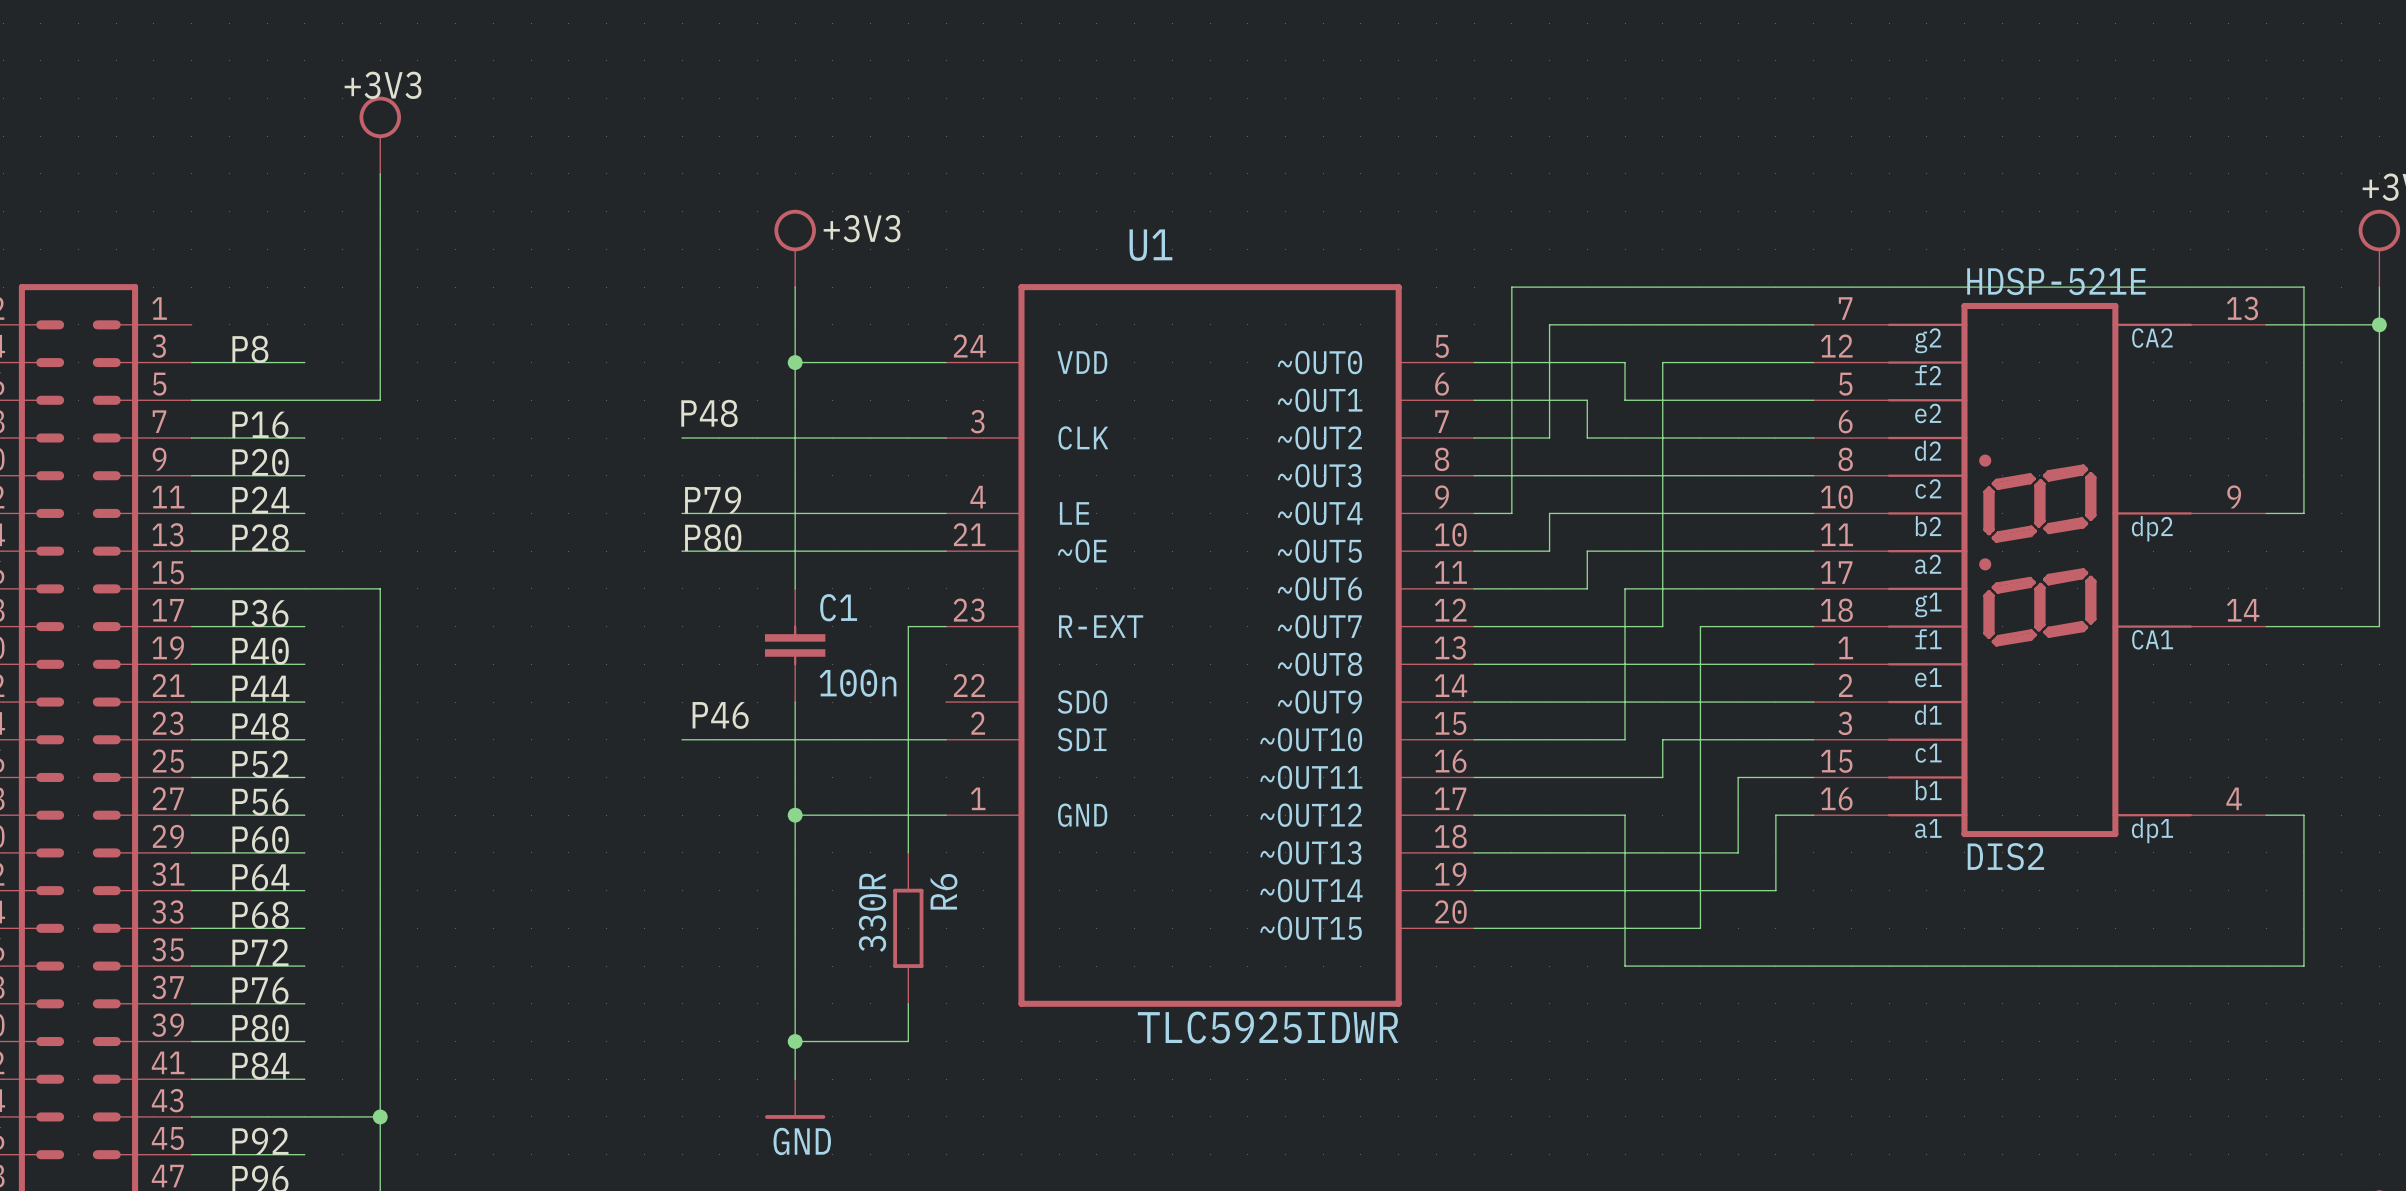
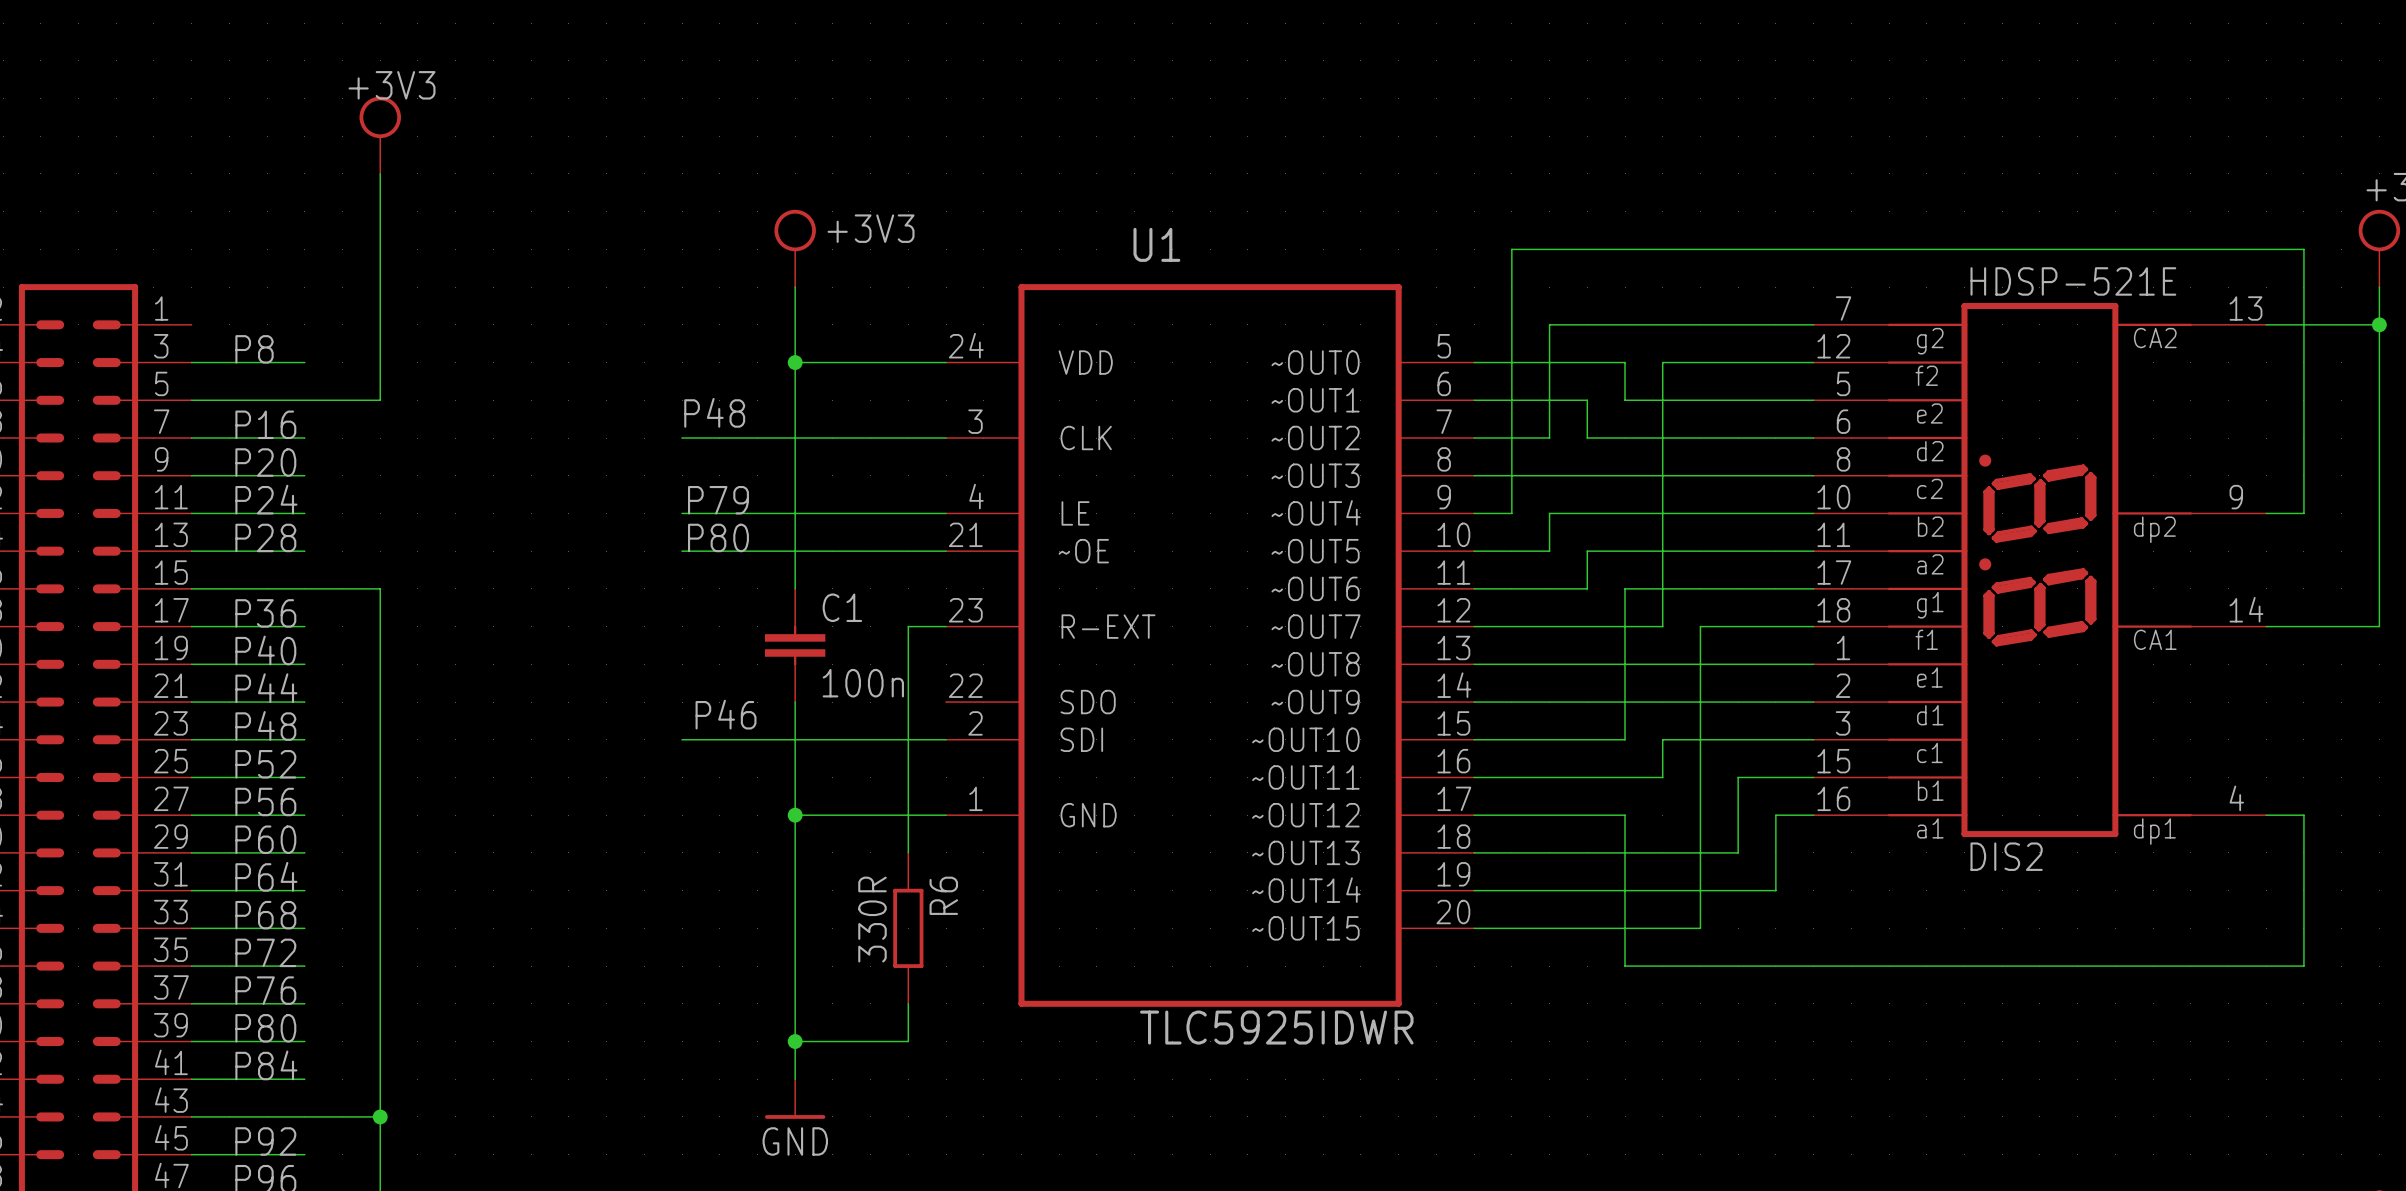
wire: (1511, 287) (2303, 287) -> (1511, 287) (1511, 249) (2303, 249) (2303, 287)

